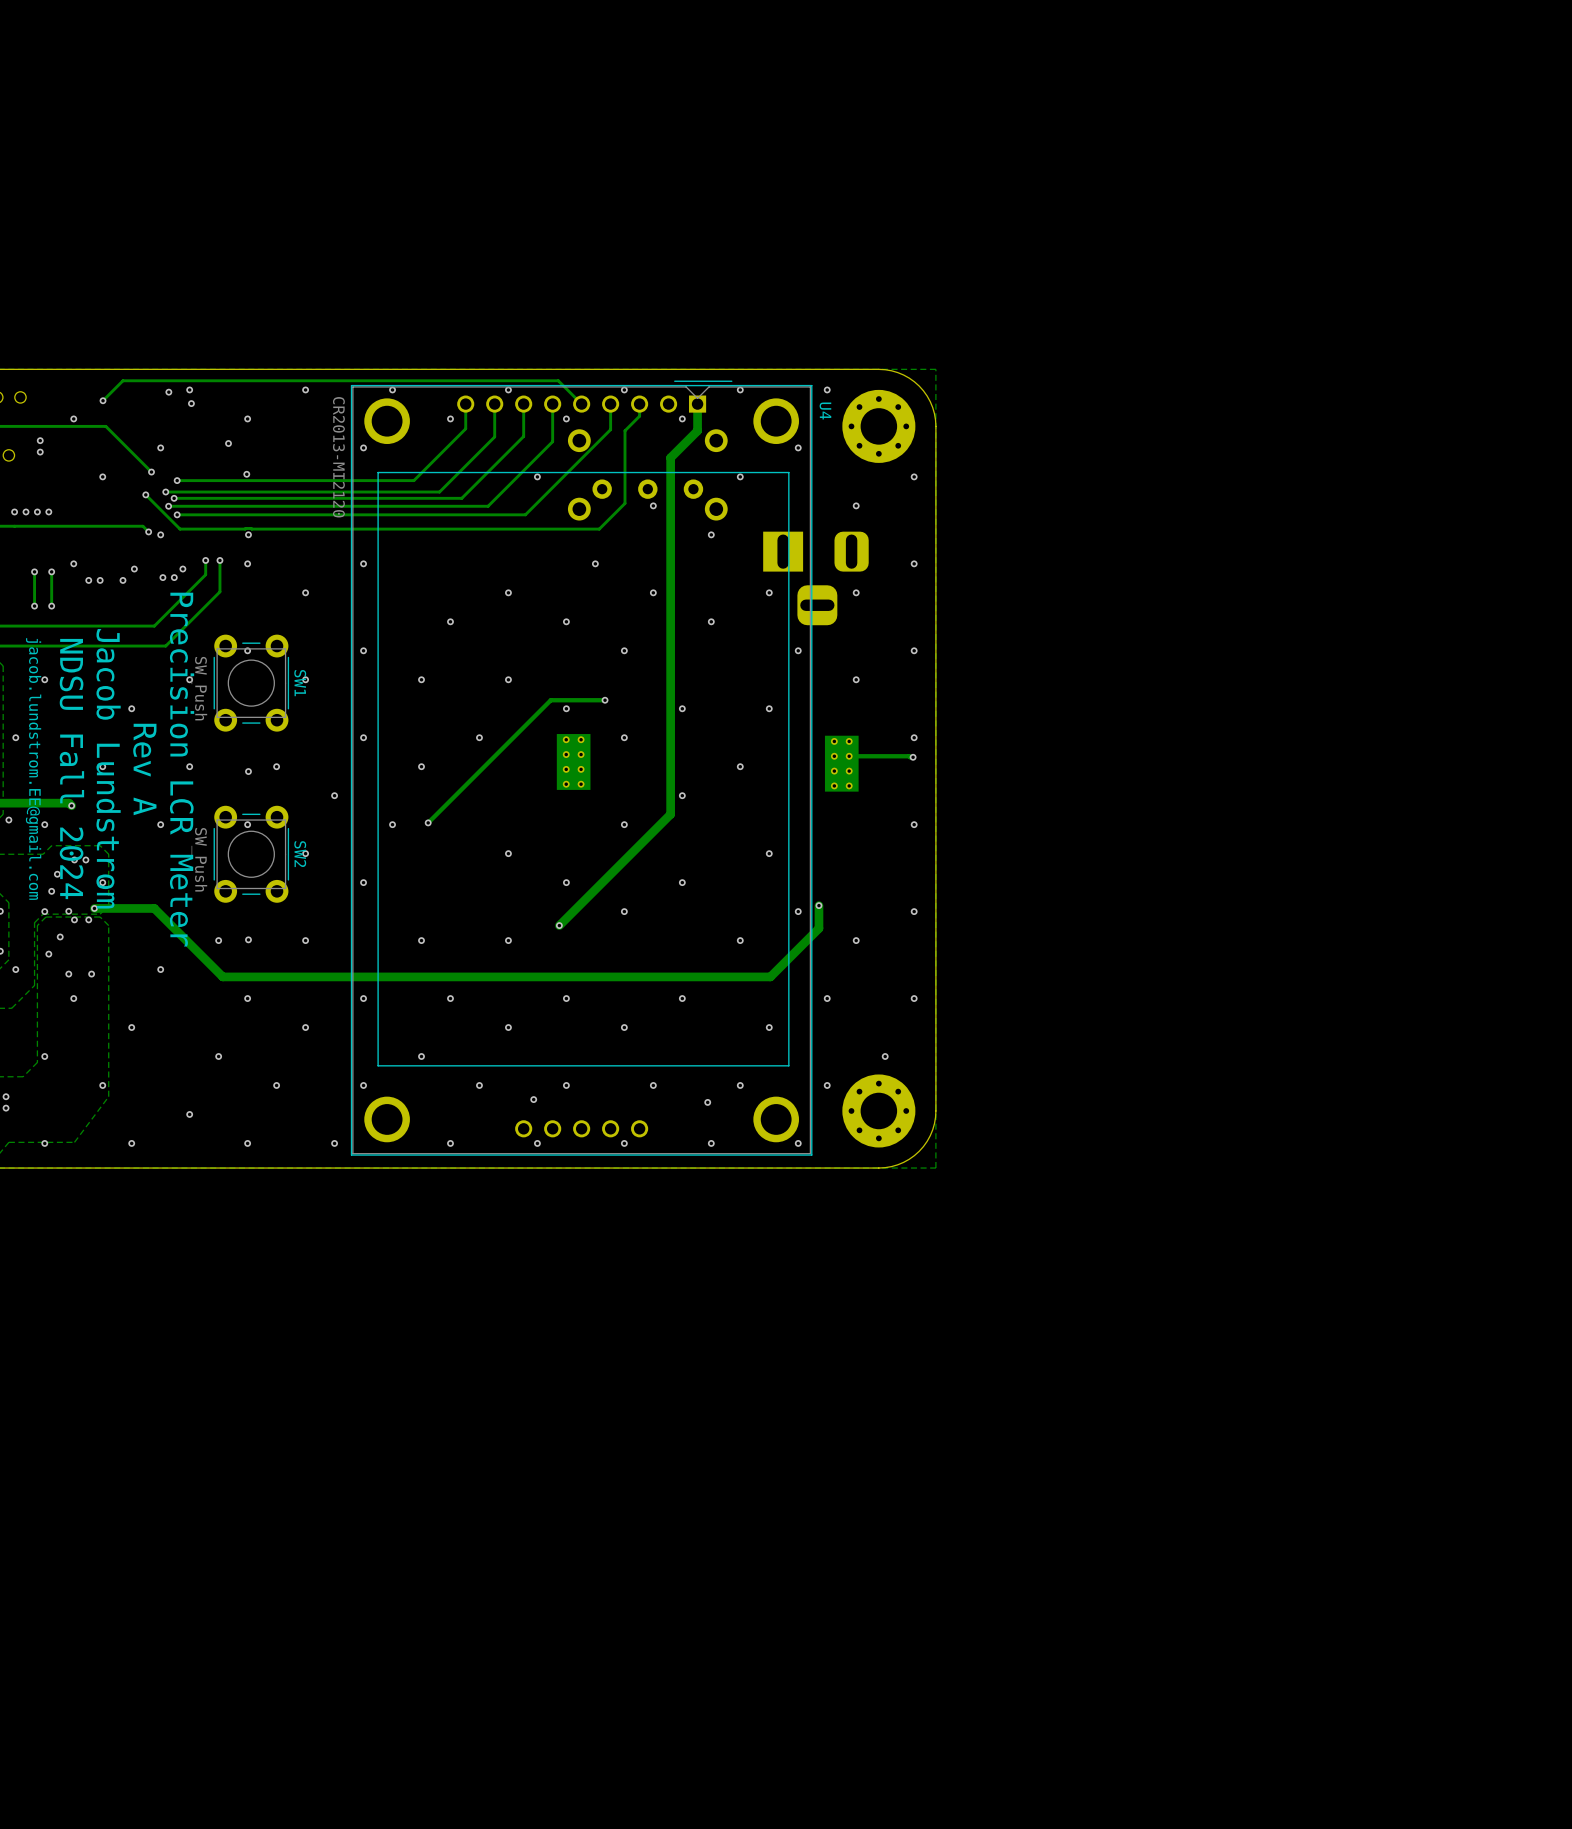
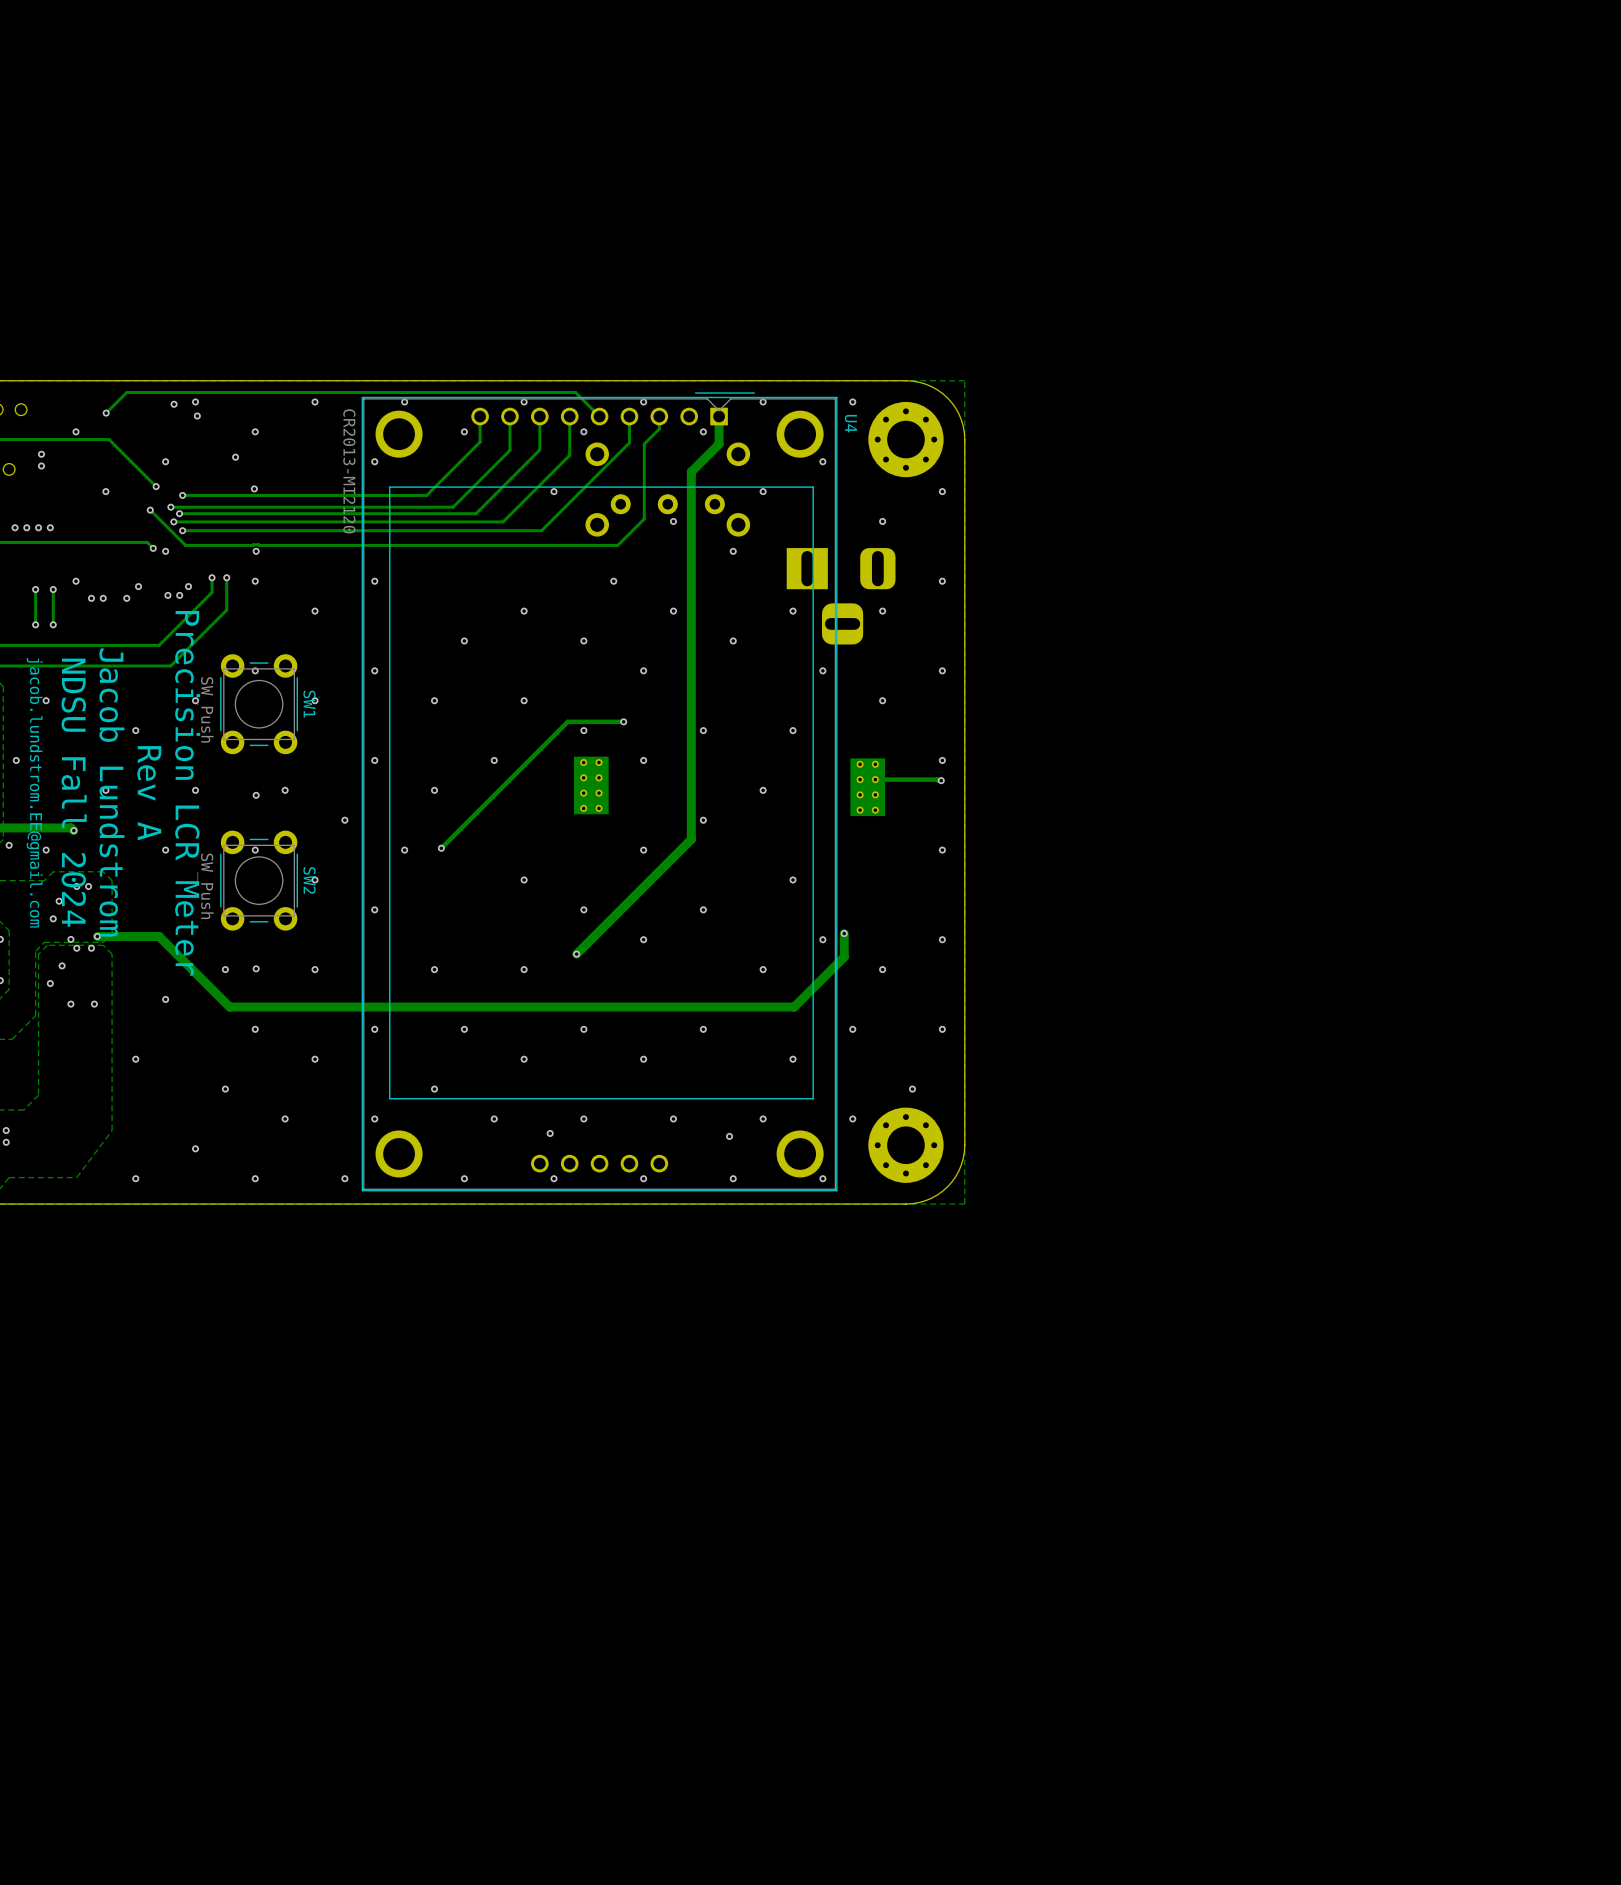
via: (102, 882) -> none
via: (44, 911) -> none
via: (15, 969) -> none
via: (73, 998) -> none
via: (44, 1056) -> none
via: (102, 1085) -> none
via: (44, 1143) -> none

